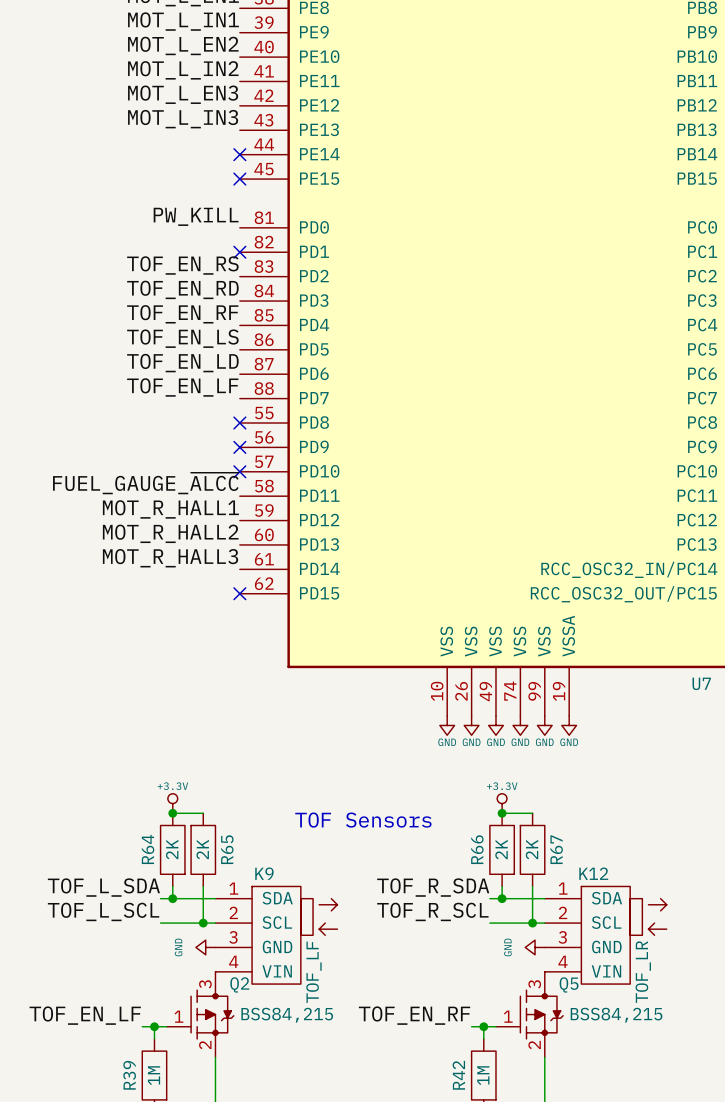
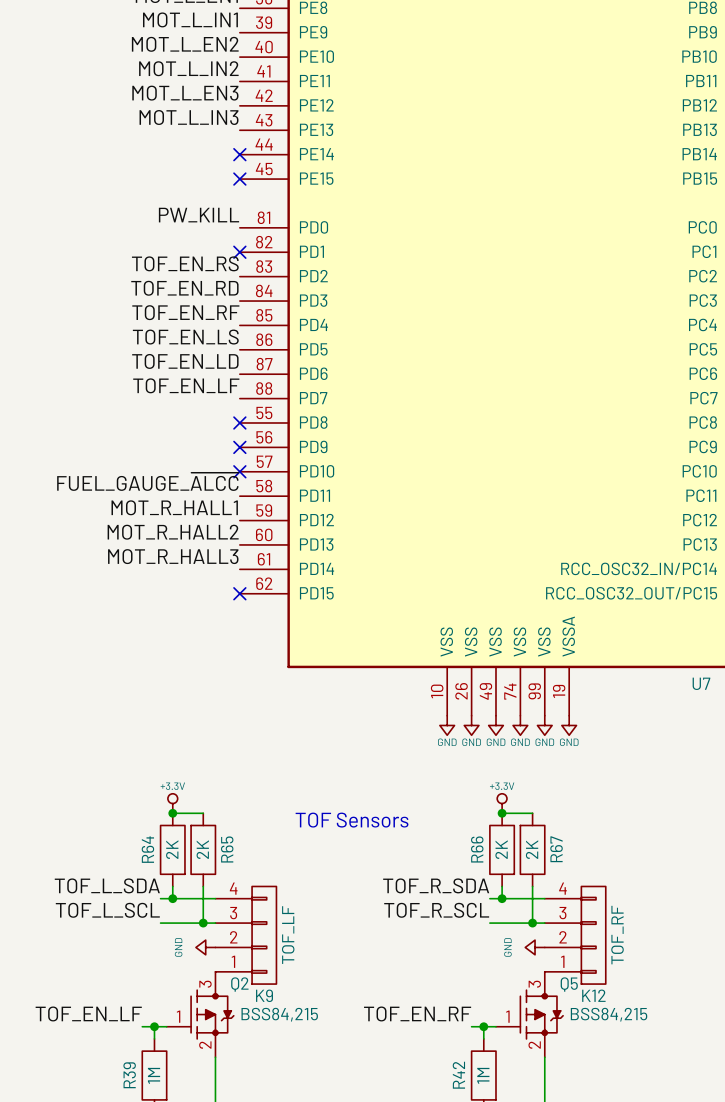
K9 name position: K9 (264, 873) -> K9 (264, 995)
K12 name position: K12 (593, 873) -> K12 (593, 995)
K9 symbol: [215, 886, 338, 985] -> [215, 886, 277, 985]
K12 symbol: [544, 886, 667, 985] -> [544, 886, 606, 985]
K9 value position: TOF_LF (313, 972) -> TOF_LF (288, 935)
K12 value: TOF_LR (643, 972) -> TOF_RF (617, 935)

